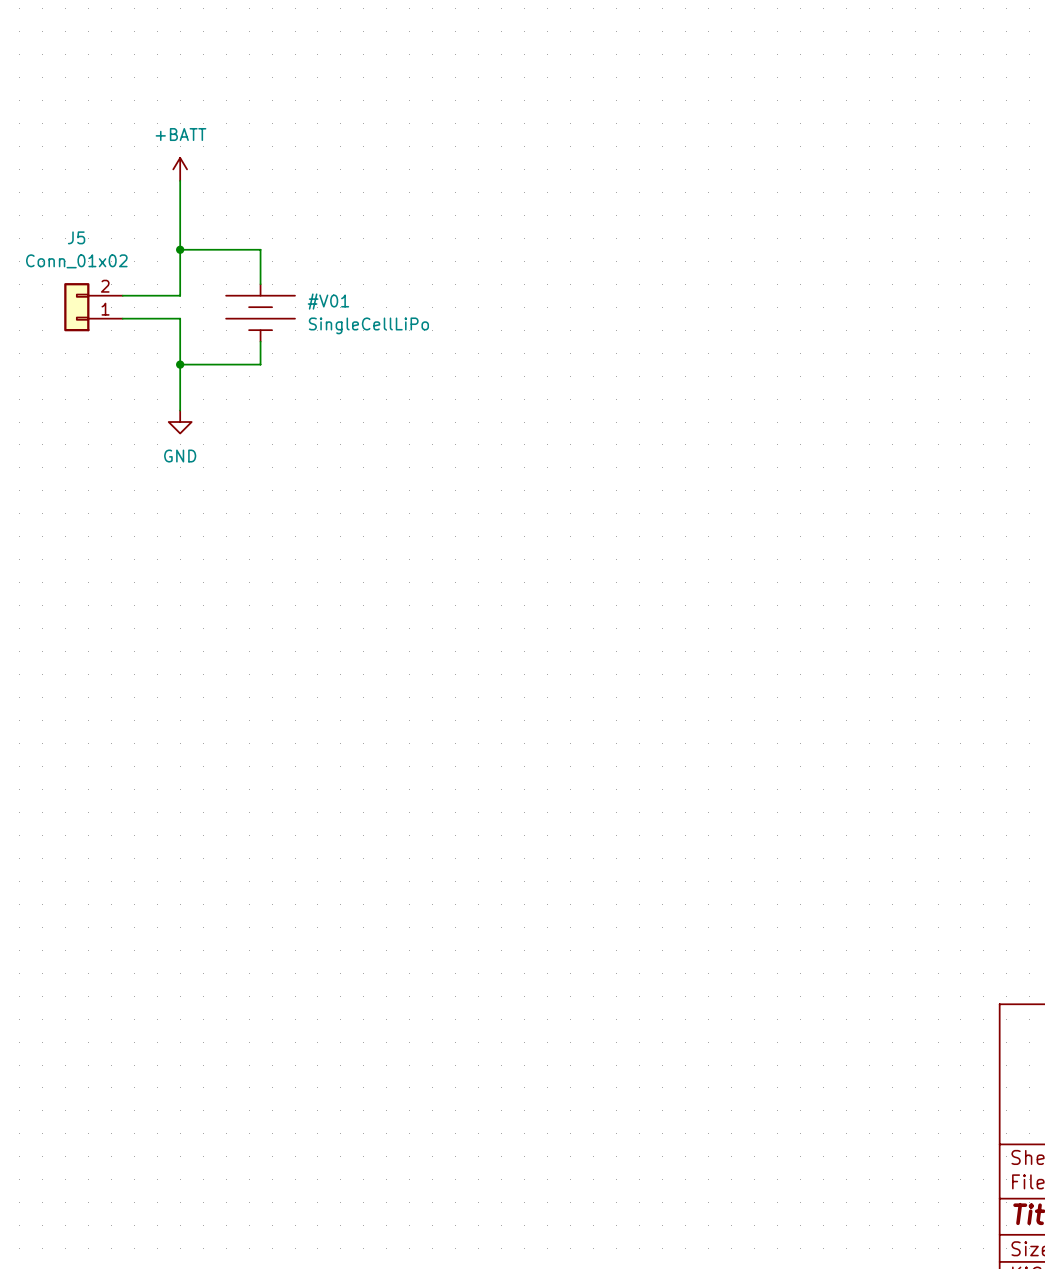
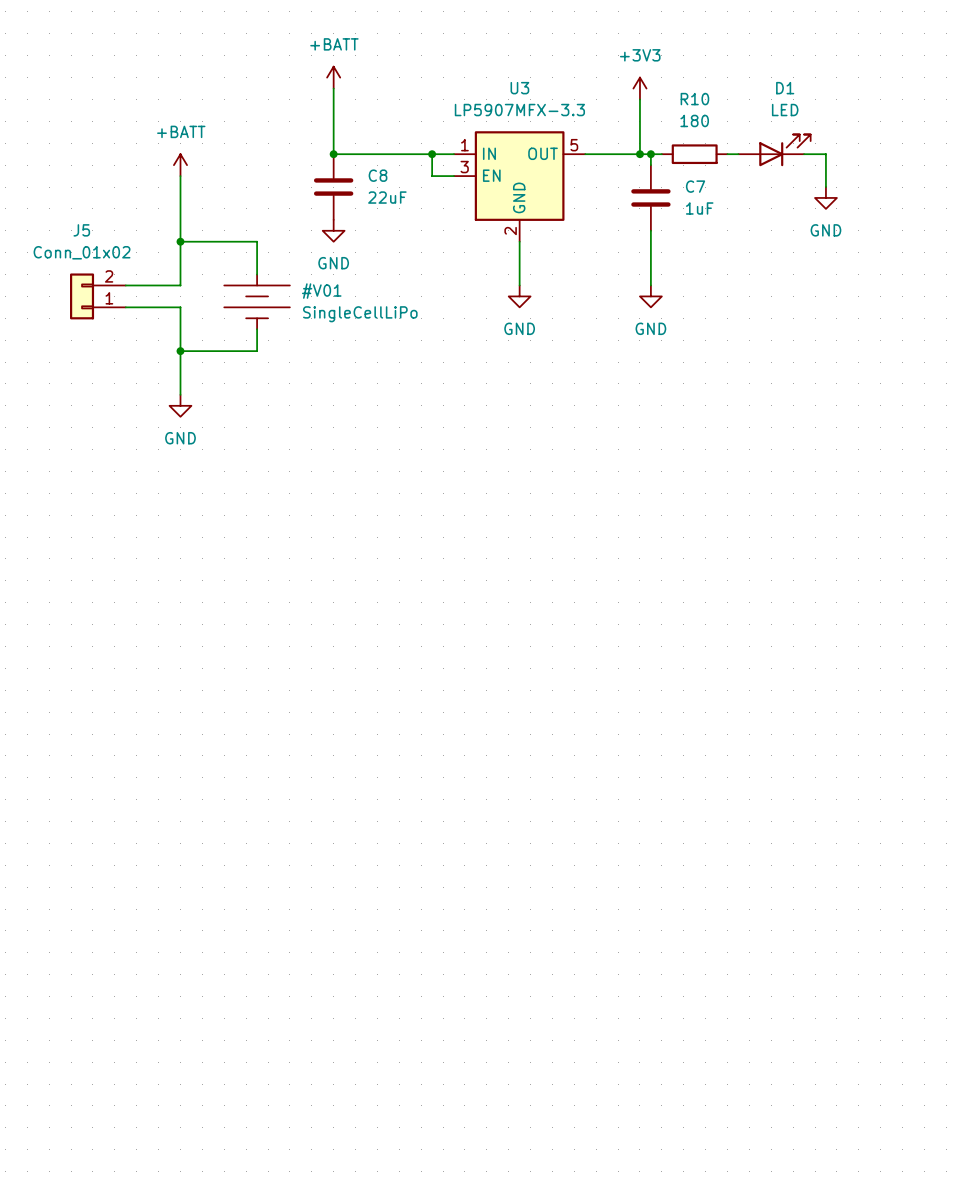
power symbol: none -> +BATT (333, 77)
wire: none -> (333, 88) (333, 154) (453, 154)
power symbol: none -> +3V3 (639, 88)
wire: none -> (639, 99) (639, 154)
D1: none -> LED (774, 150)
junction: none -> (333, 154)
wire: none -> (432, 154) (432, 176) (453, 176)
junction: none -> (432, 154)
wire: none -> (585, 154) (661, 154)
junction: none -> (639, 154)
wire: none -> (650, 154) (650, 165)
junction: none -> (650, 154)
R10: none -> 180 (694, 154)
wire: none -> (727, 154) (738, 154)
wire: none -> (804, 154) (825, 154) (825, 187)
U3: none -> LP5907MFX-3.3 (519, 186)
C8: none -> 22uF (333, 187)
C7: none -> 1uF (650, 197)
power symbol: none -> GND (825, 197)
power symbol: none -> GND (333, 230)
wire: none -> (650, 230) (650, 285)
wire: none -> (519, 241) (519, 285)
power symbol: none -> GND (519, 296)
power symbol: none -> GND (650, 296)

